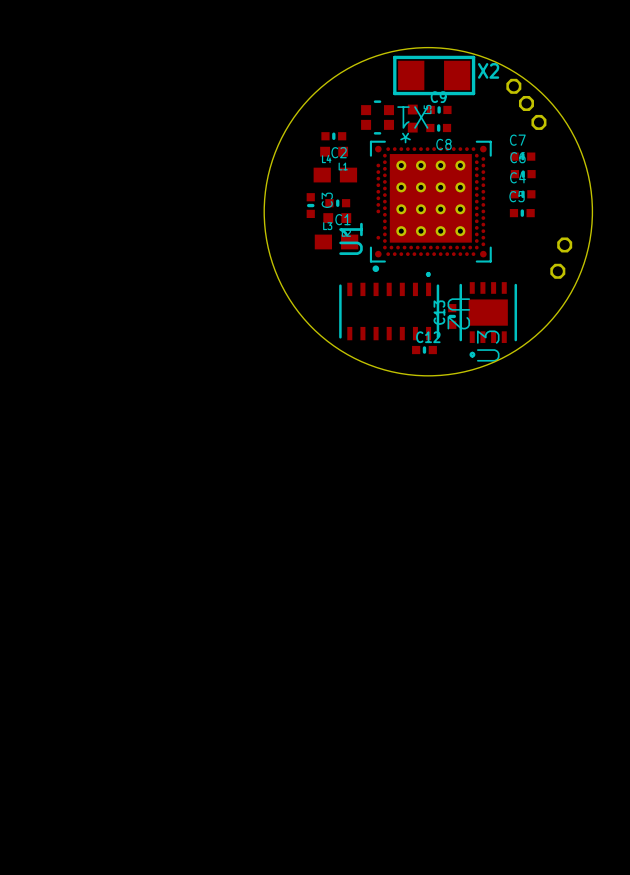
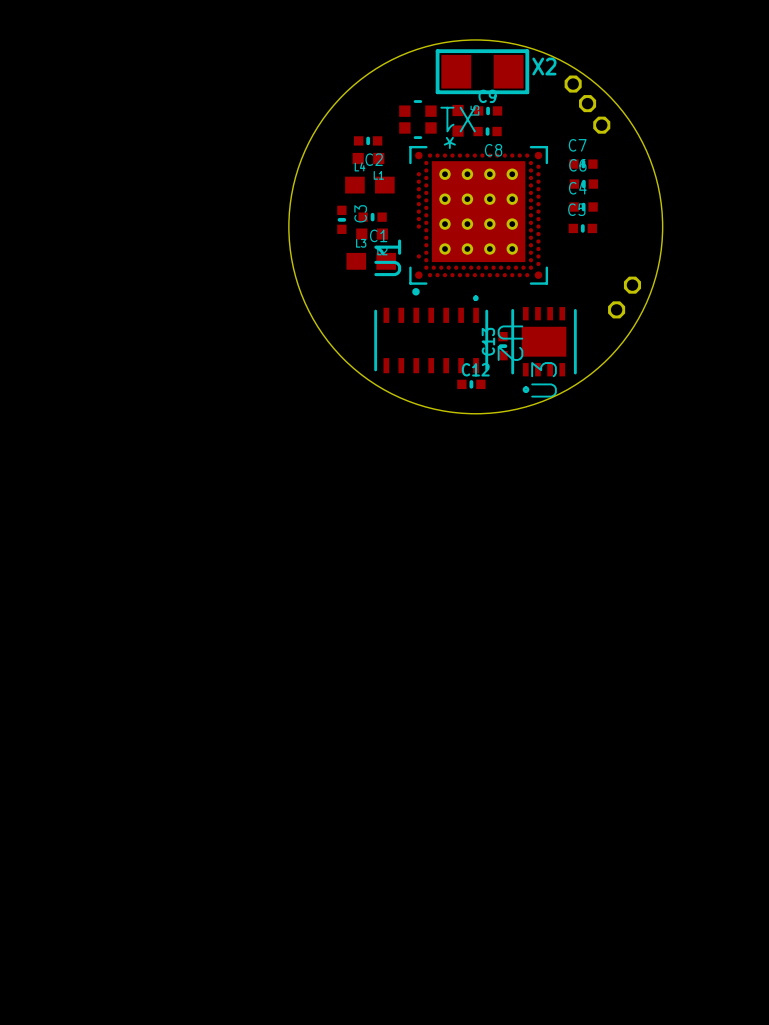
part: (564, 244) -> none
part: none -> (632, 285)
part: (557, 271) -> none
part: none -> (616, 309)

